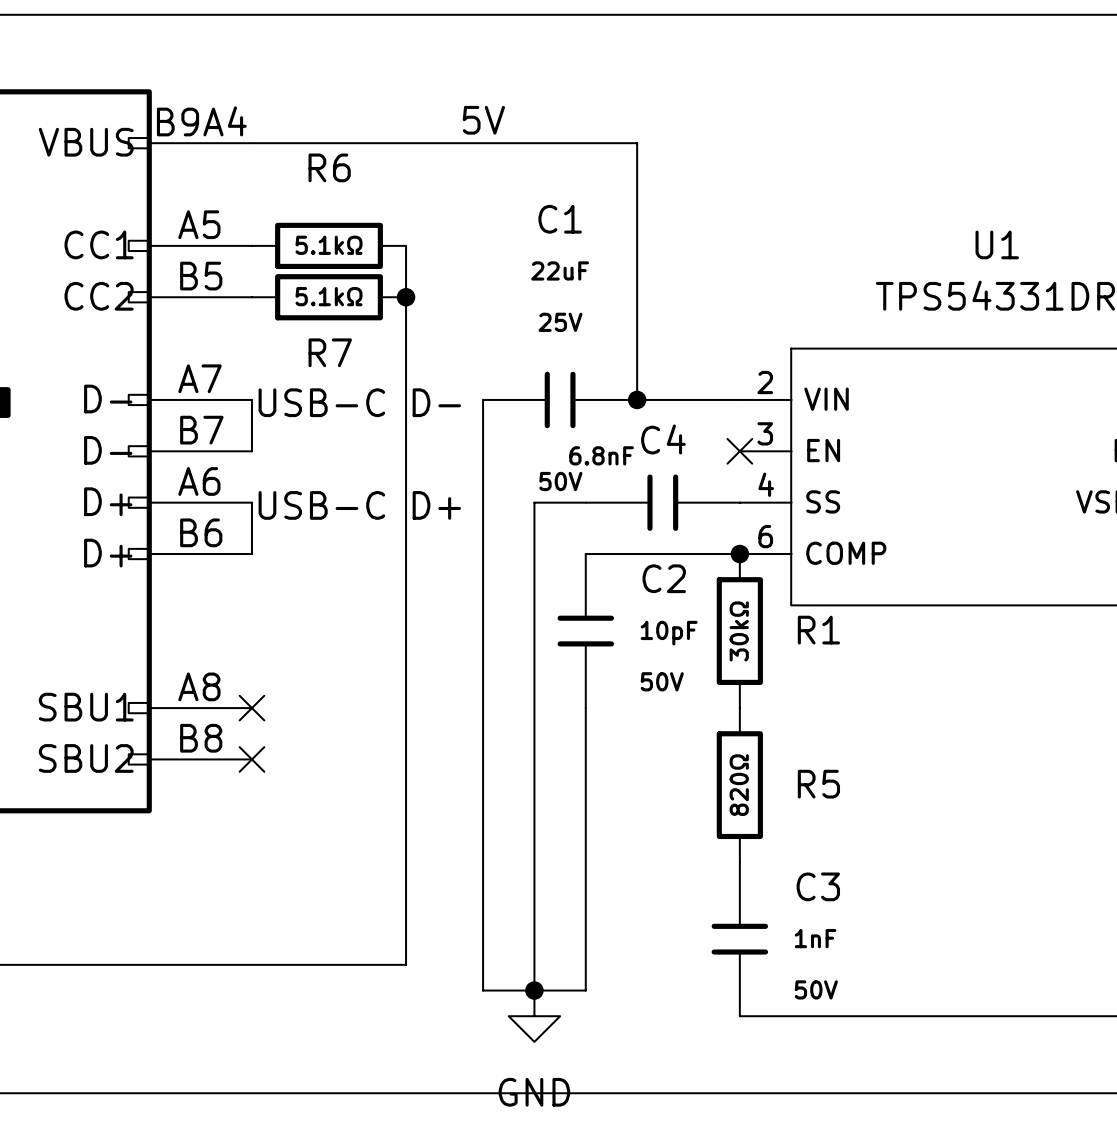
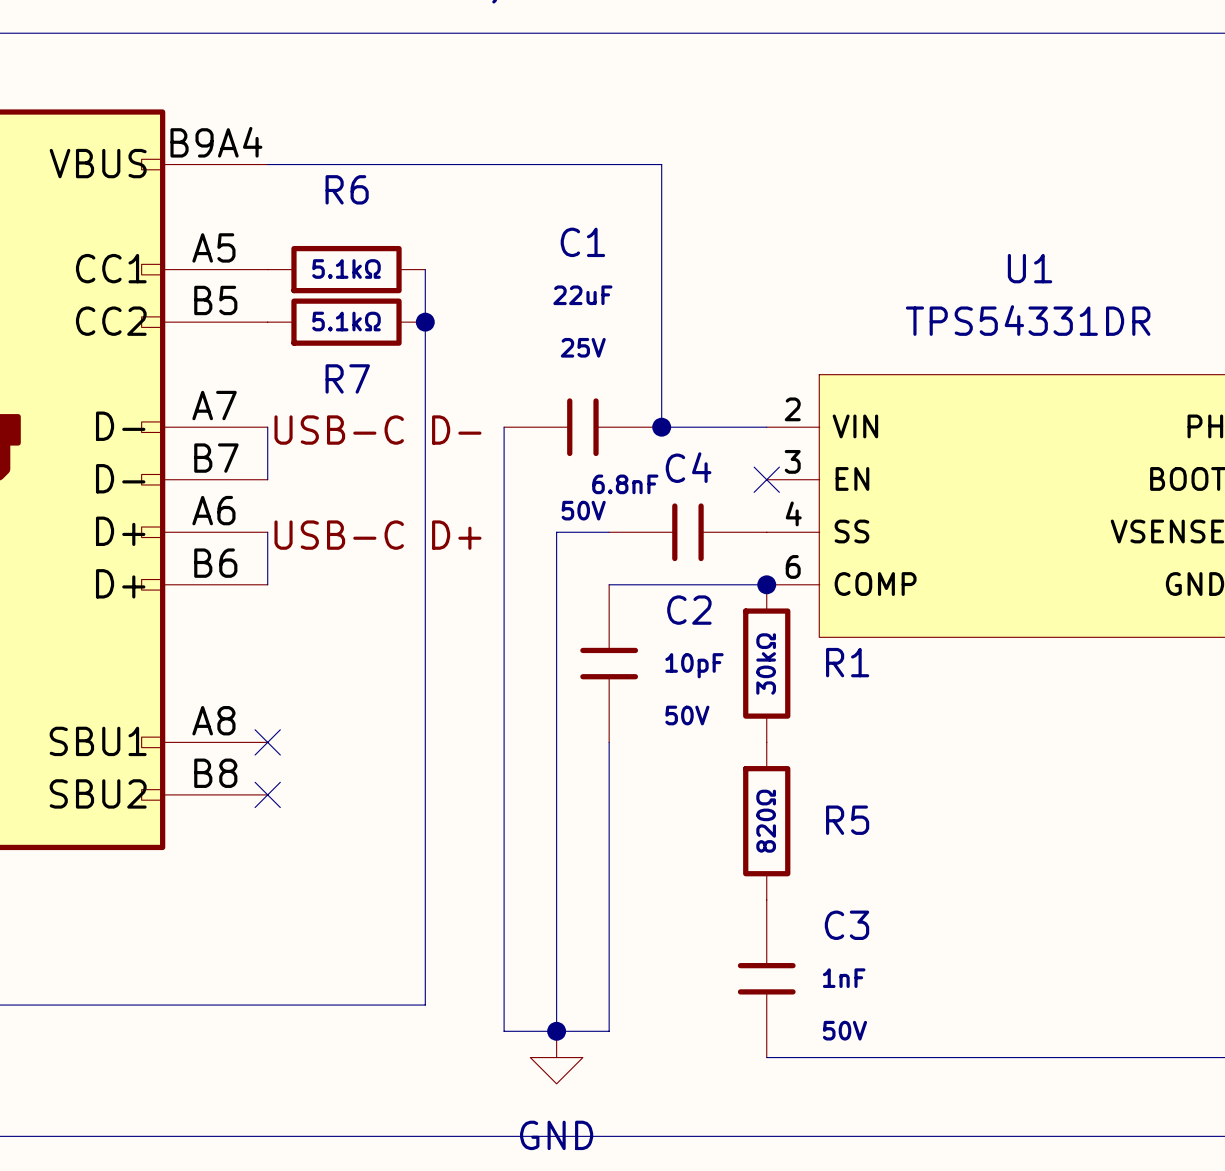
label: 5V (483, 120) -> none

